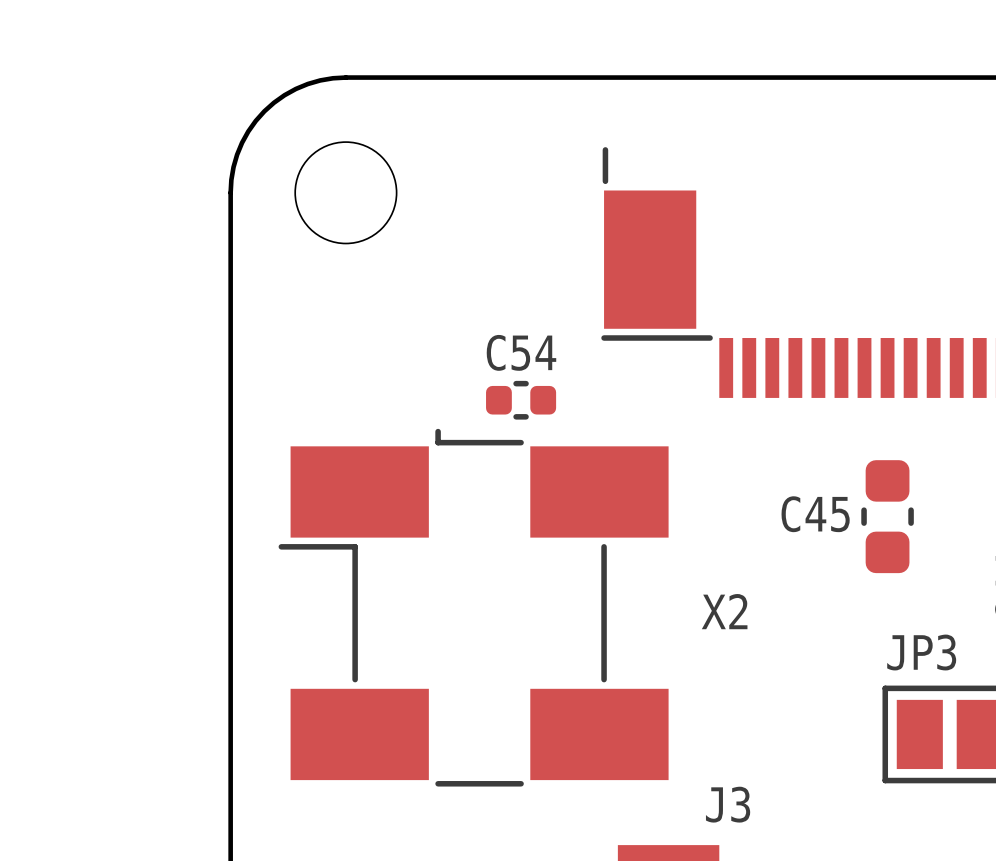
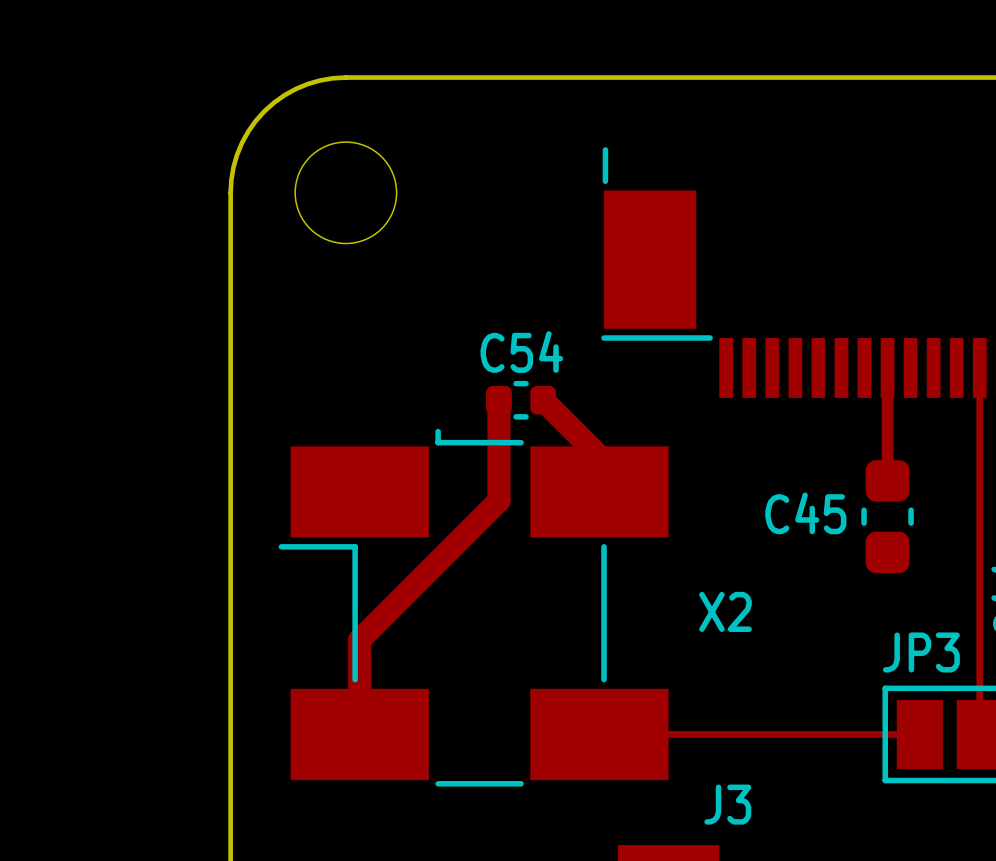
track: none -> (887, 358) (887, 480)
track: none -> (979, 367) (979, 734)
track: none -> (498, 400) (498, 500) (359, 639) (359, 734)
track: none -> (543, 400) (599, 456) (599, 491)
track: none -> (599, 734) (919, 734)

